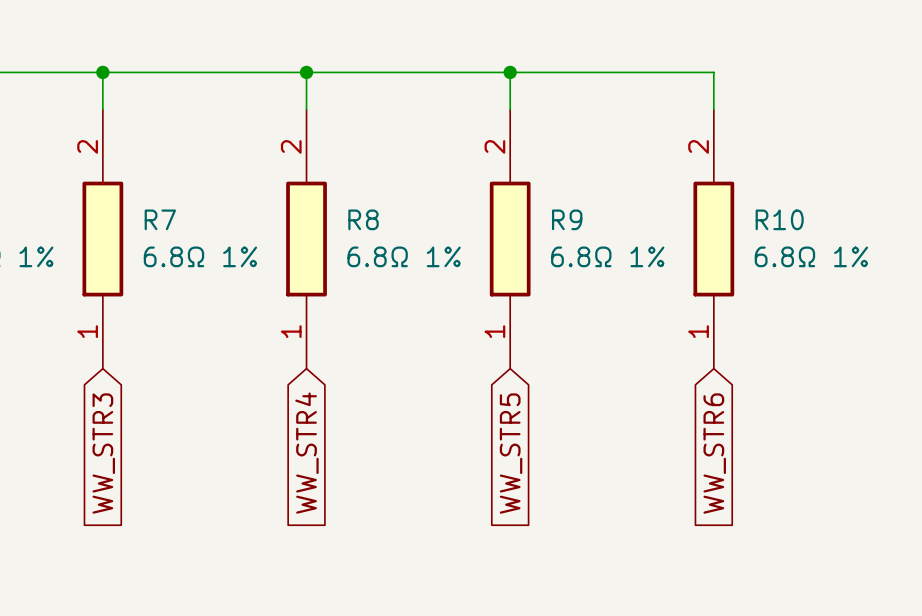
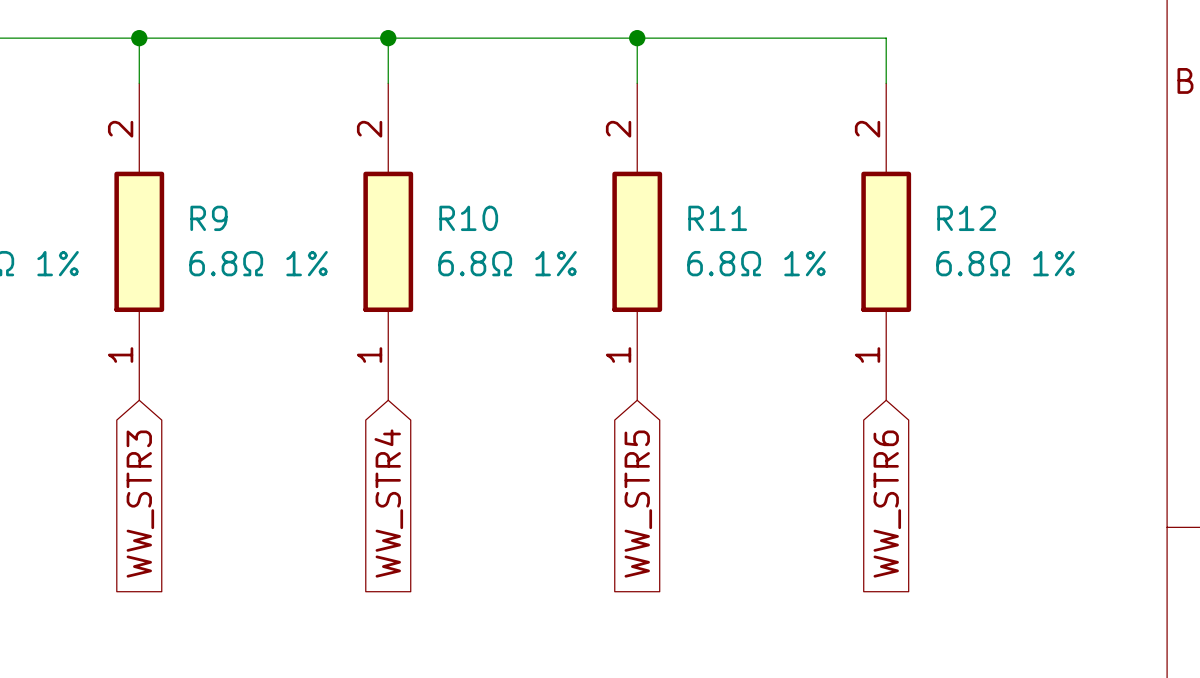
R7 name: R7 (160, 219) -> R9 (208, 218)
R8 name: R8 (363, 219) -> R10 (468, 218)
R9 name: R9 (567, 219) -> R11 (717, 218)
R10 name: R10 (779, 219) -> R12 (966, 218)

